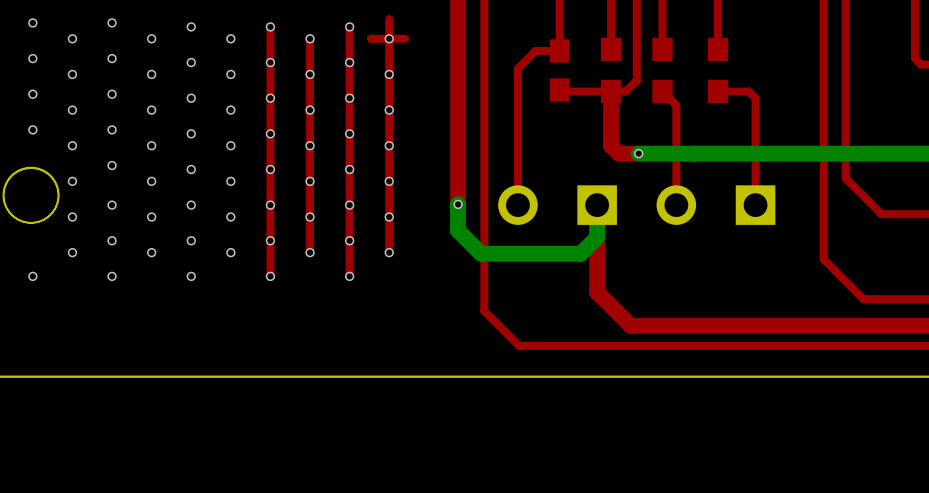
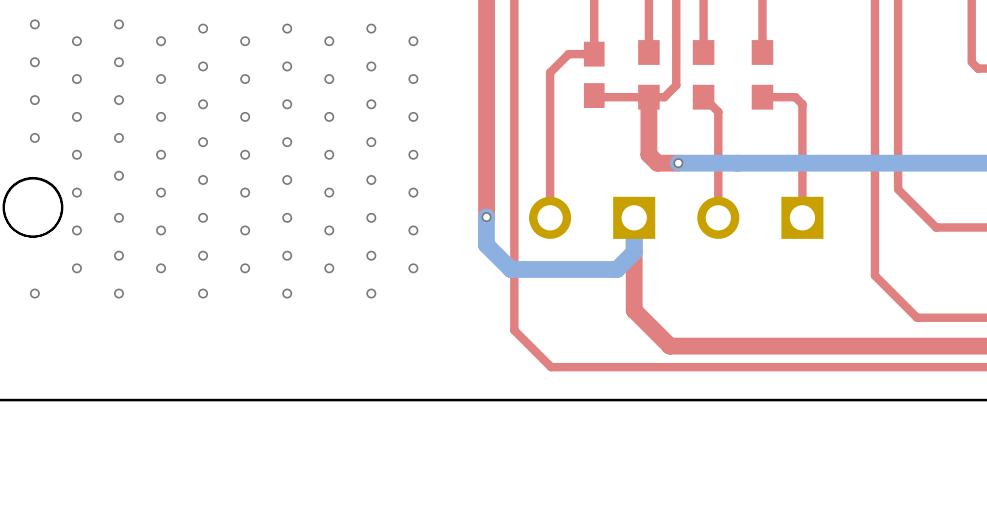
top track: (389, 18) (389, 252) -> none
top track: (270, 26) (270, 276) -> none
top track: (349, 26) (349, 276) -> none
top track: (310, 38) (310, 252) -> none
top track: (371, 38) (405, 38) -> none

